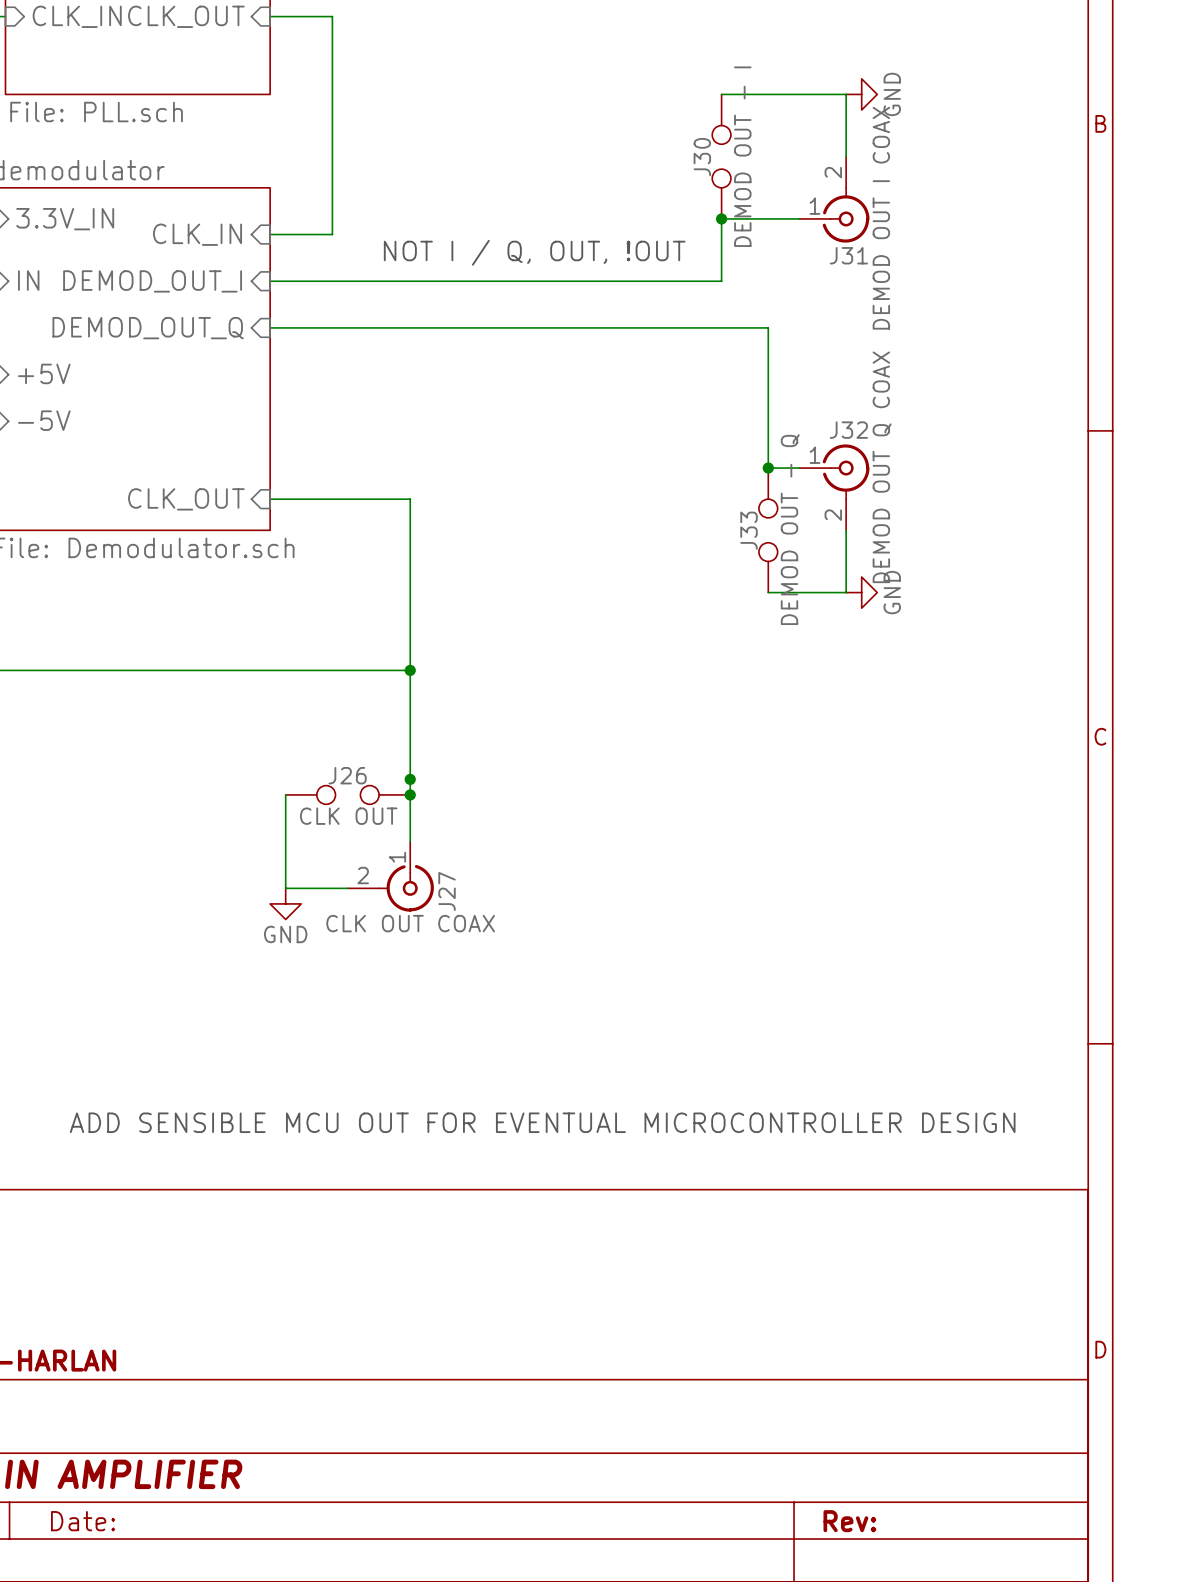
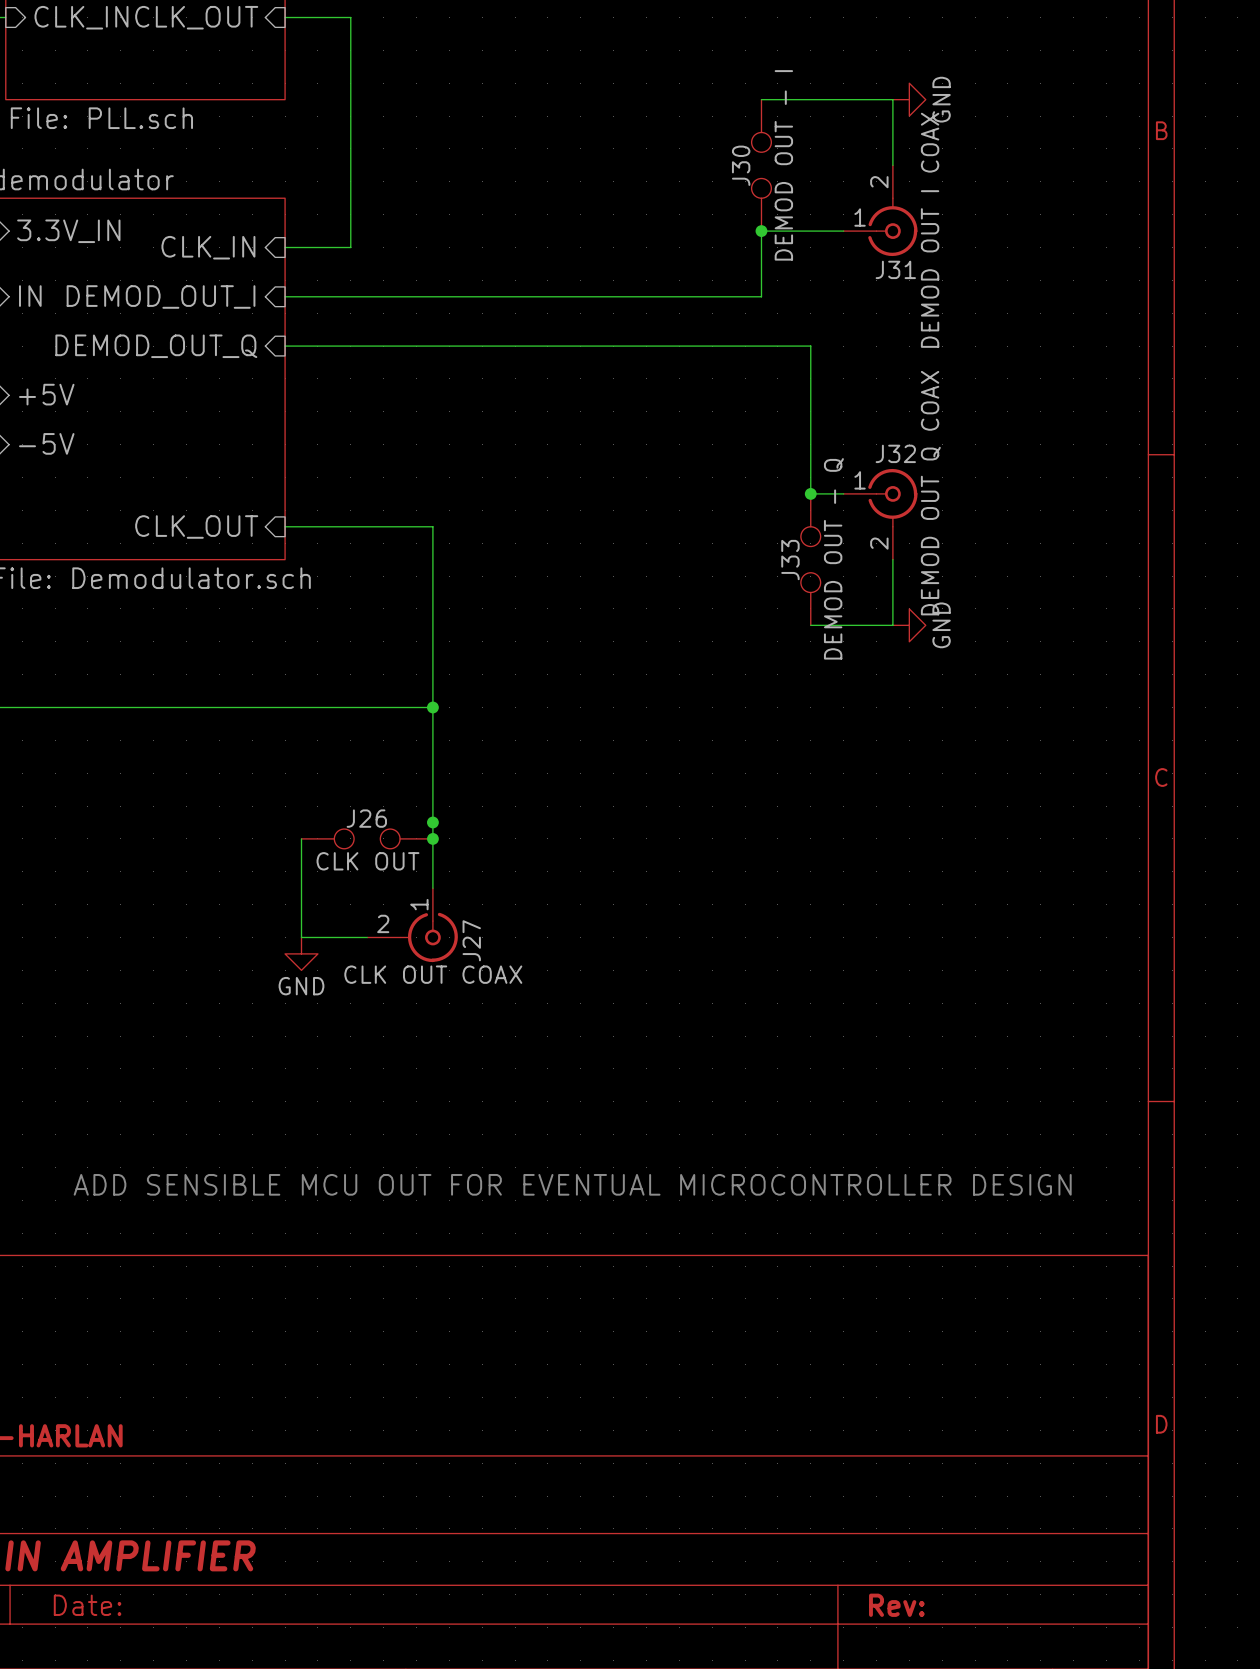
text: NOT I / Q, OUT, !OUT (534, 252) -> none

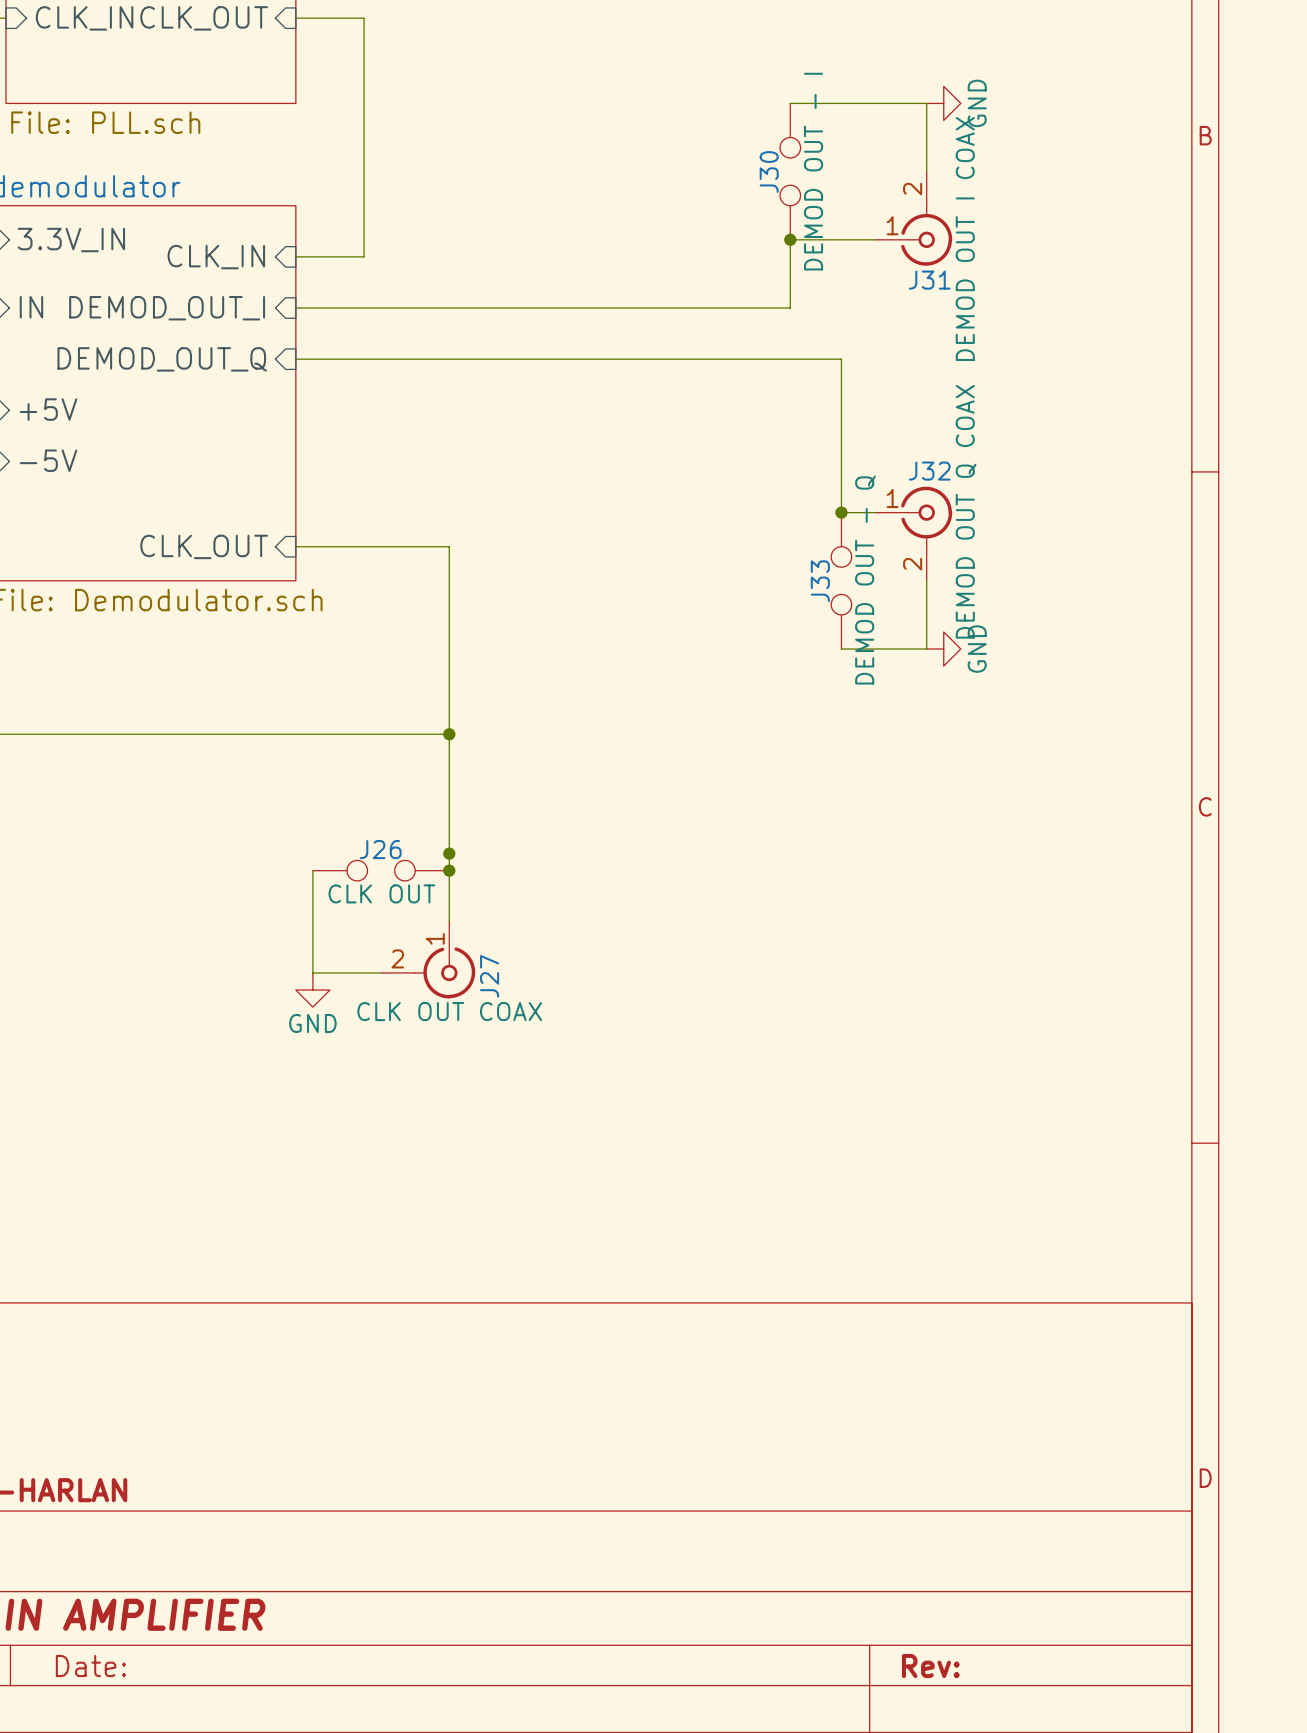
text: ADD SENSIBLE MCU OUT FOR EVENTUAL MICROCONTROLLER DESIGN (572, 1184) -> none

